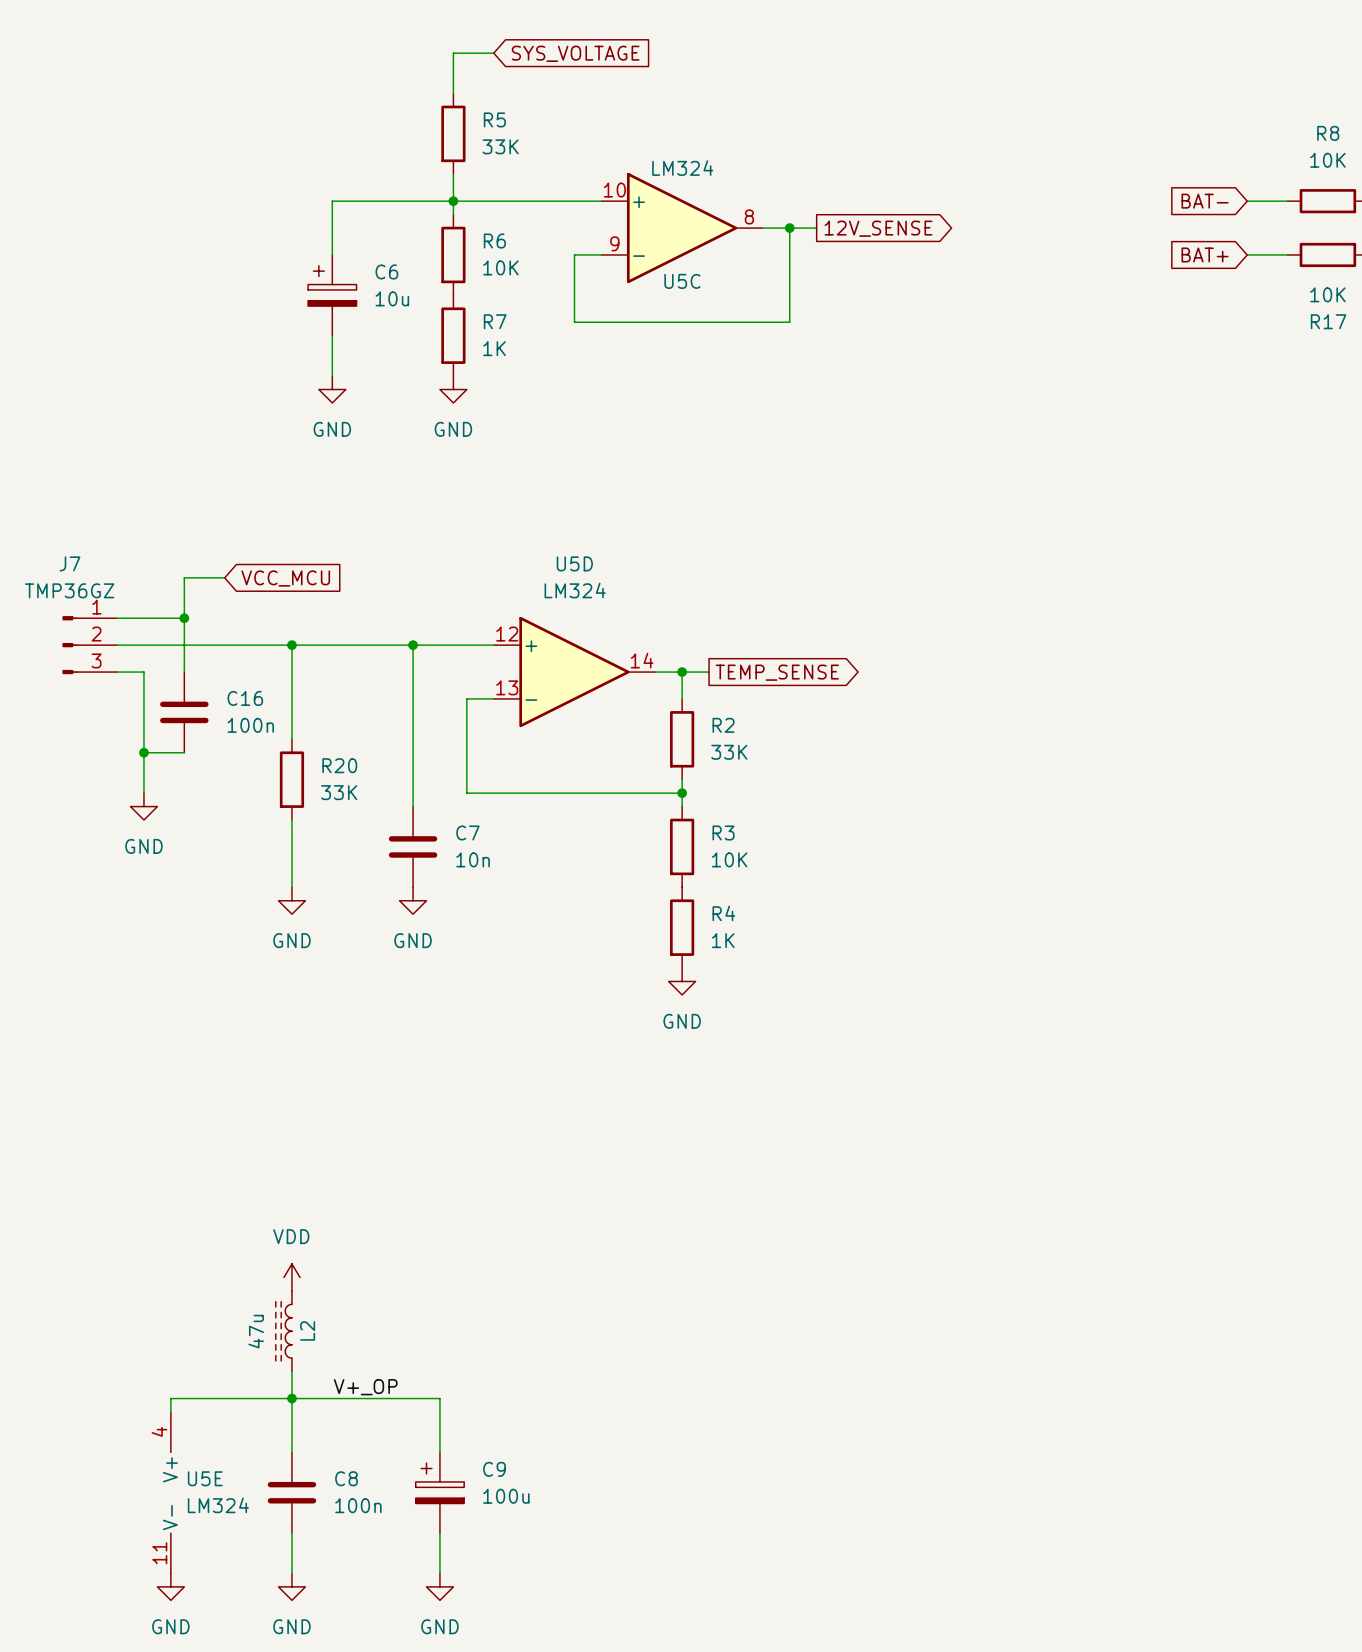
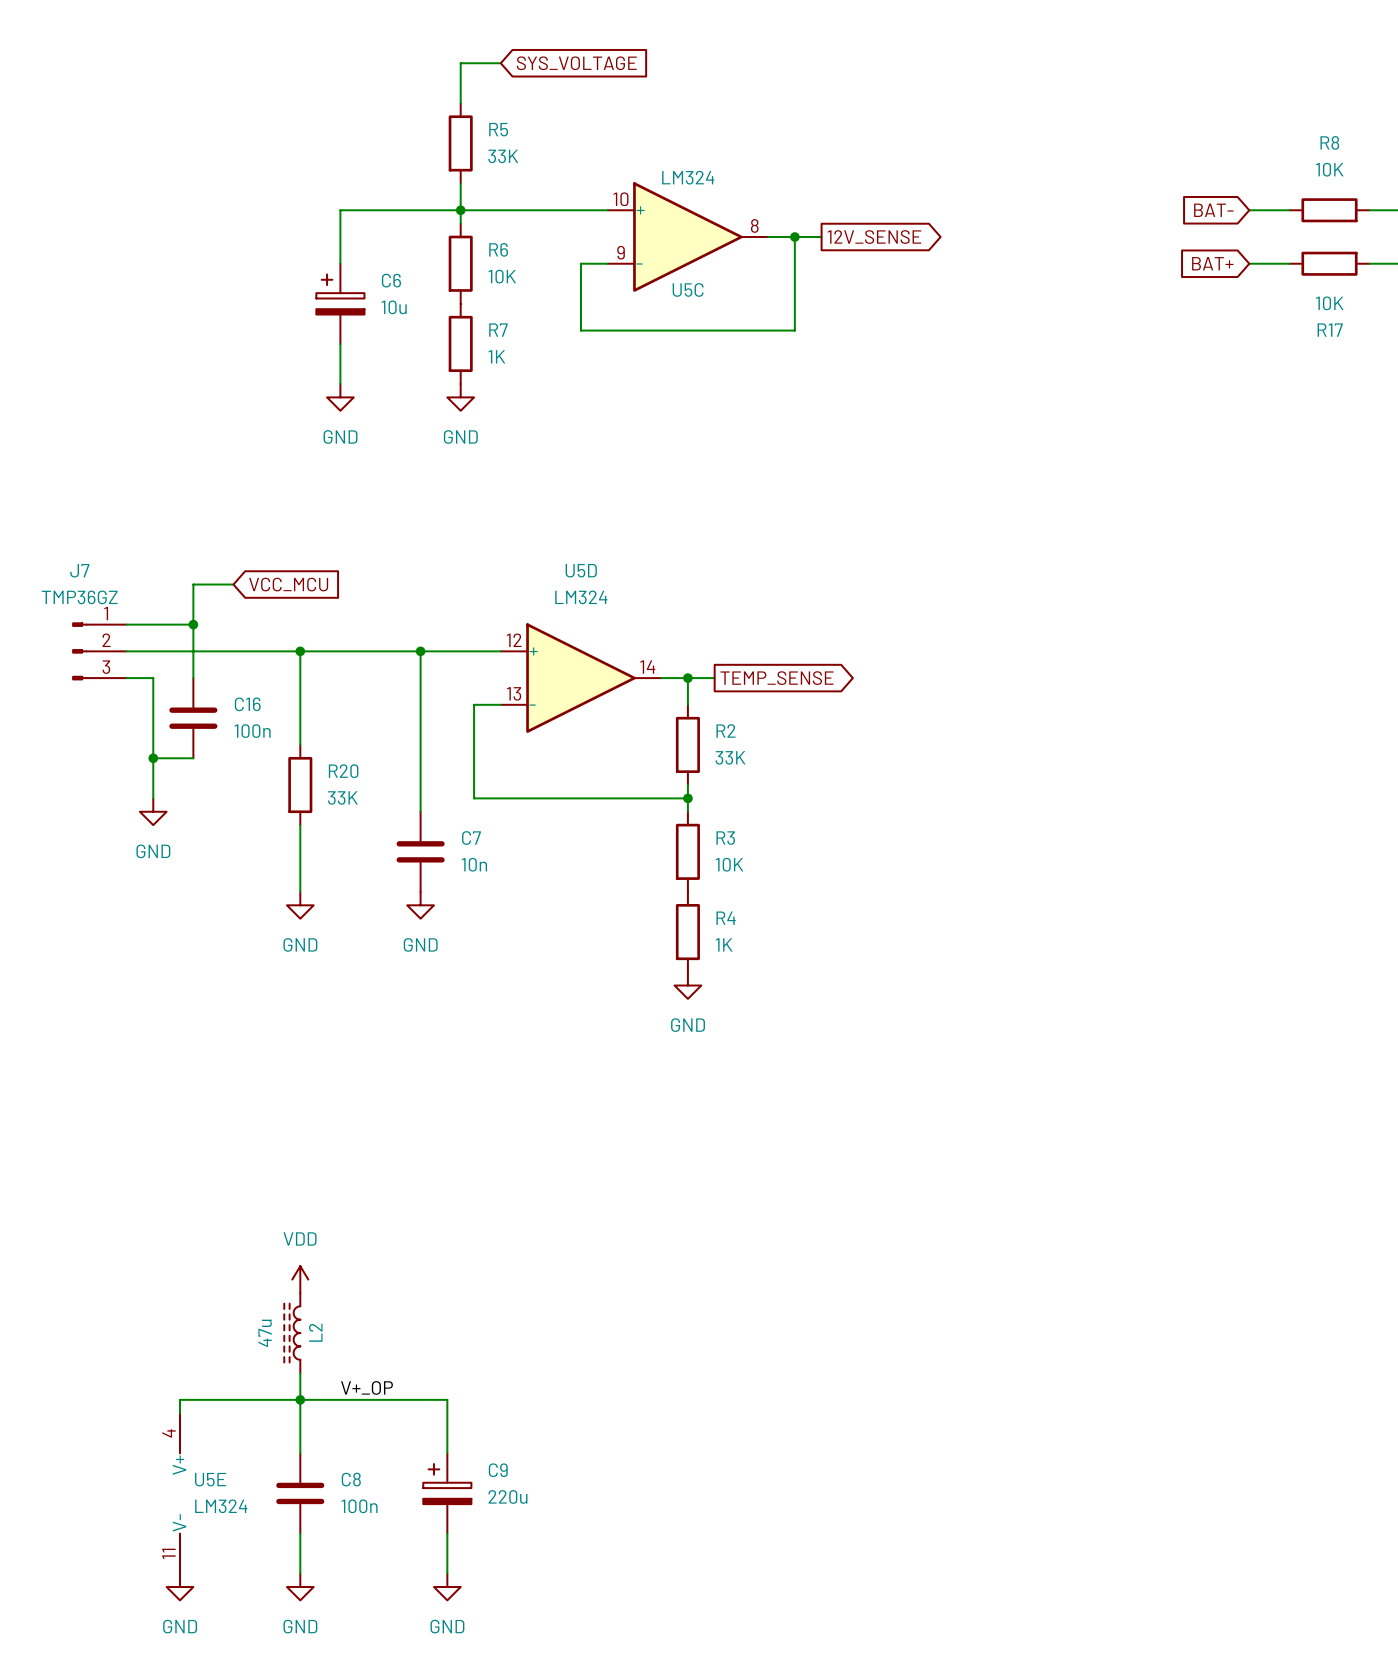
C9 value: 100u (506, 1496) -> 220u (507, 1496)

